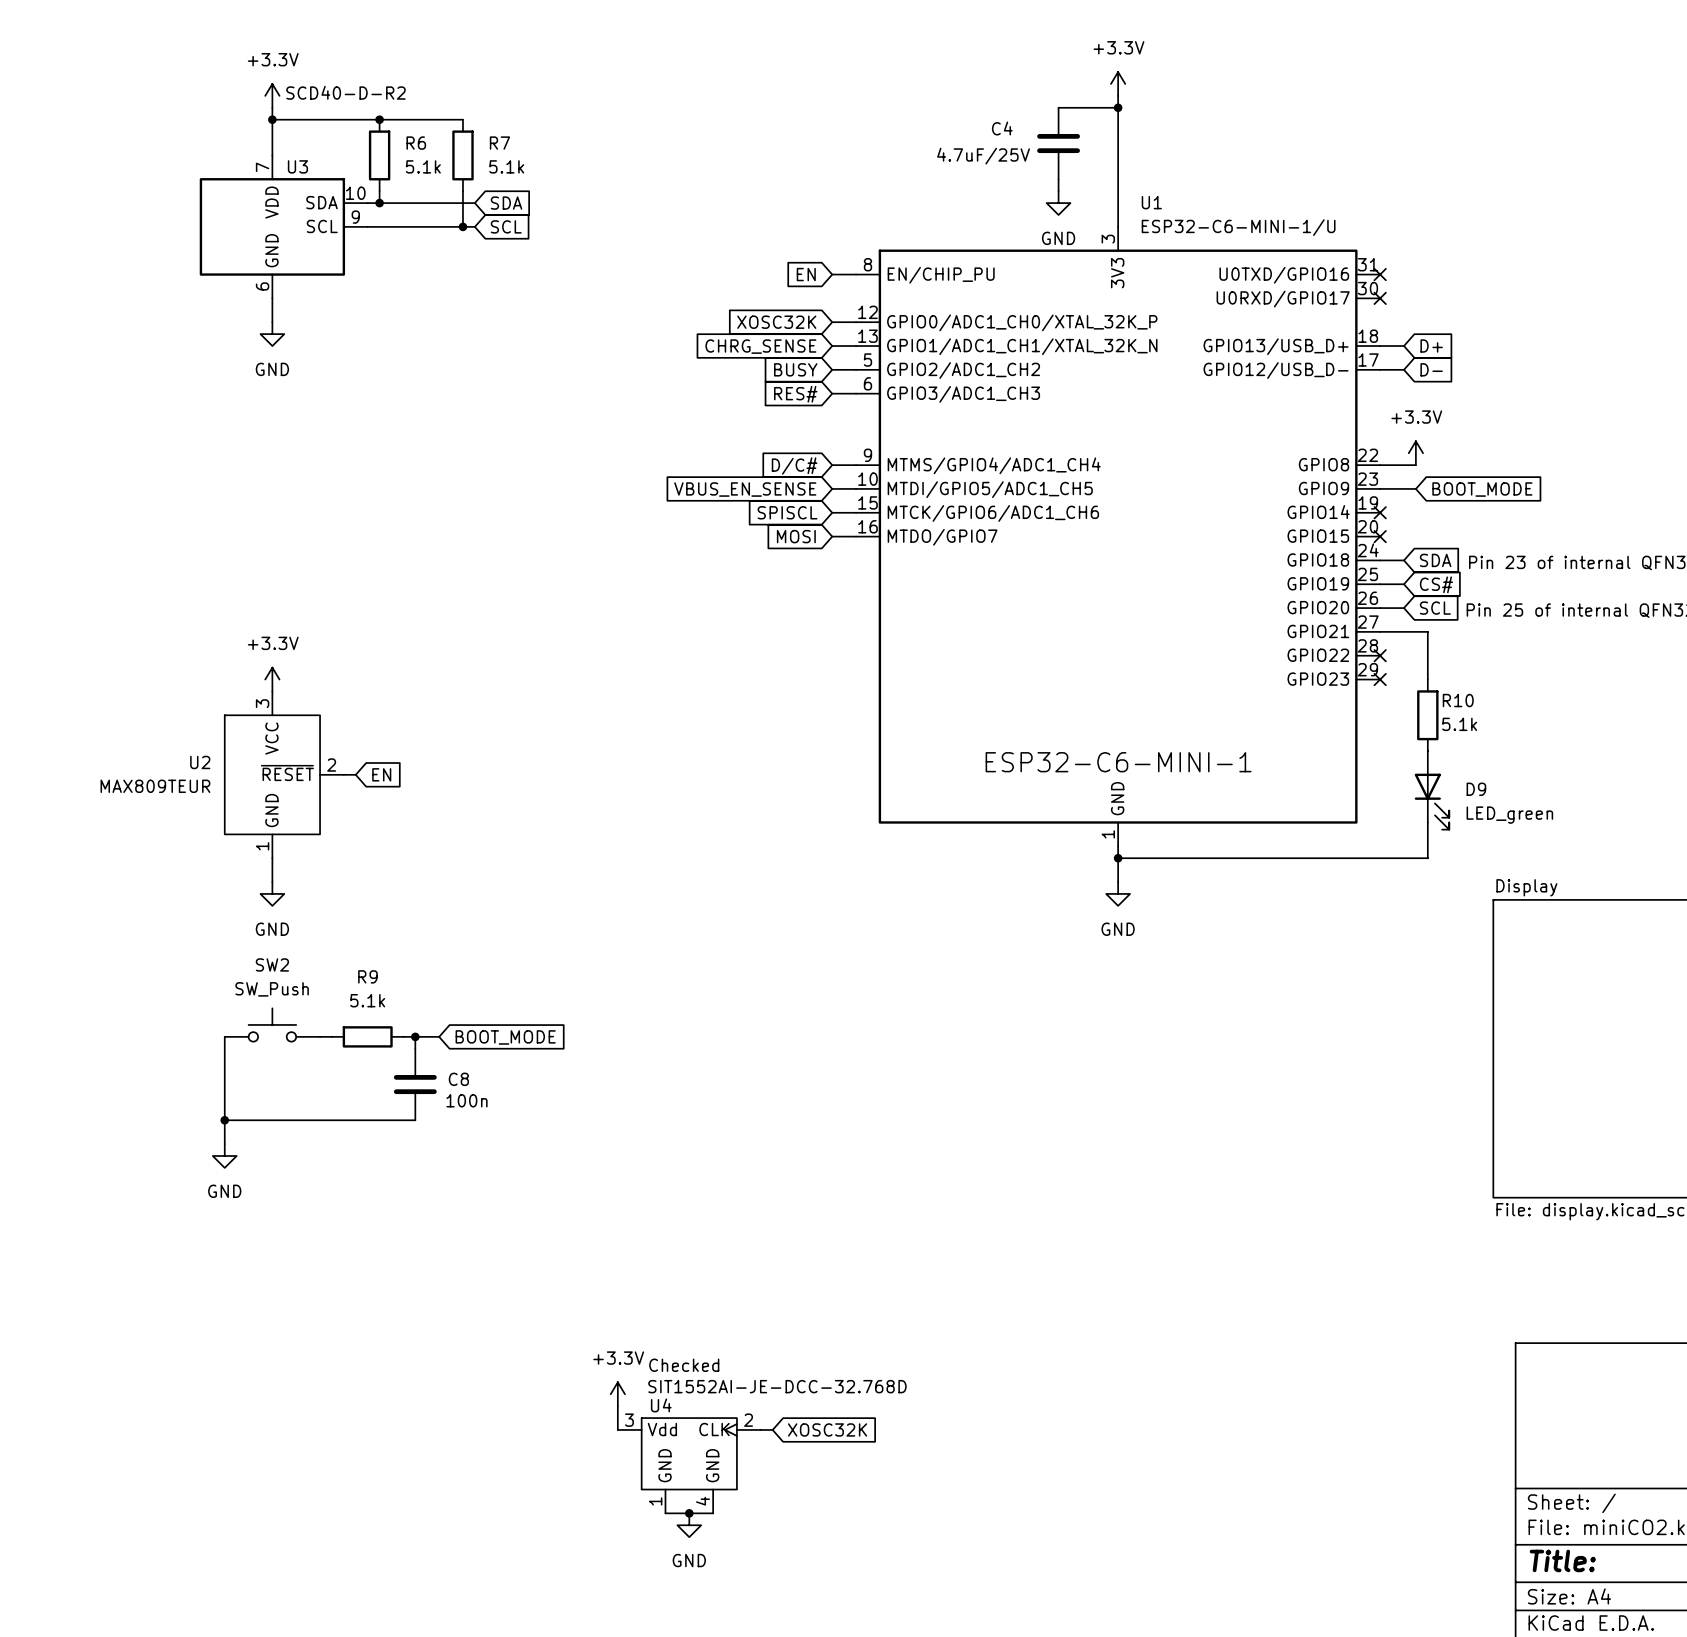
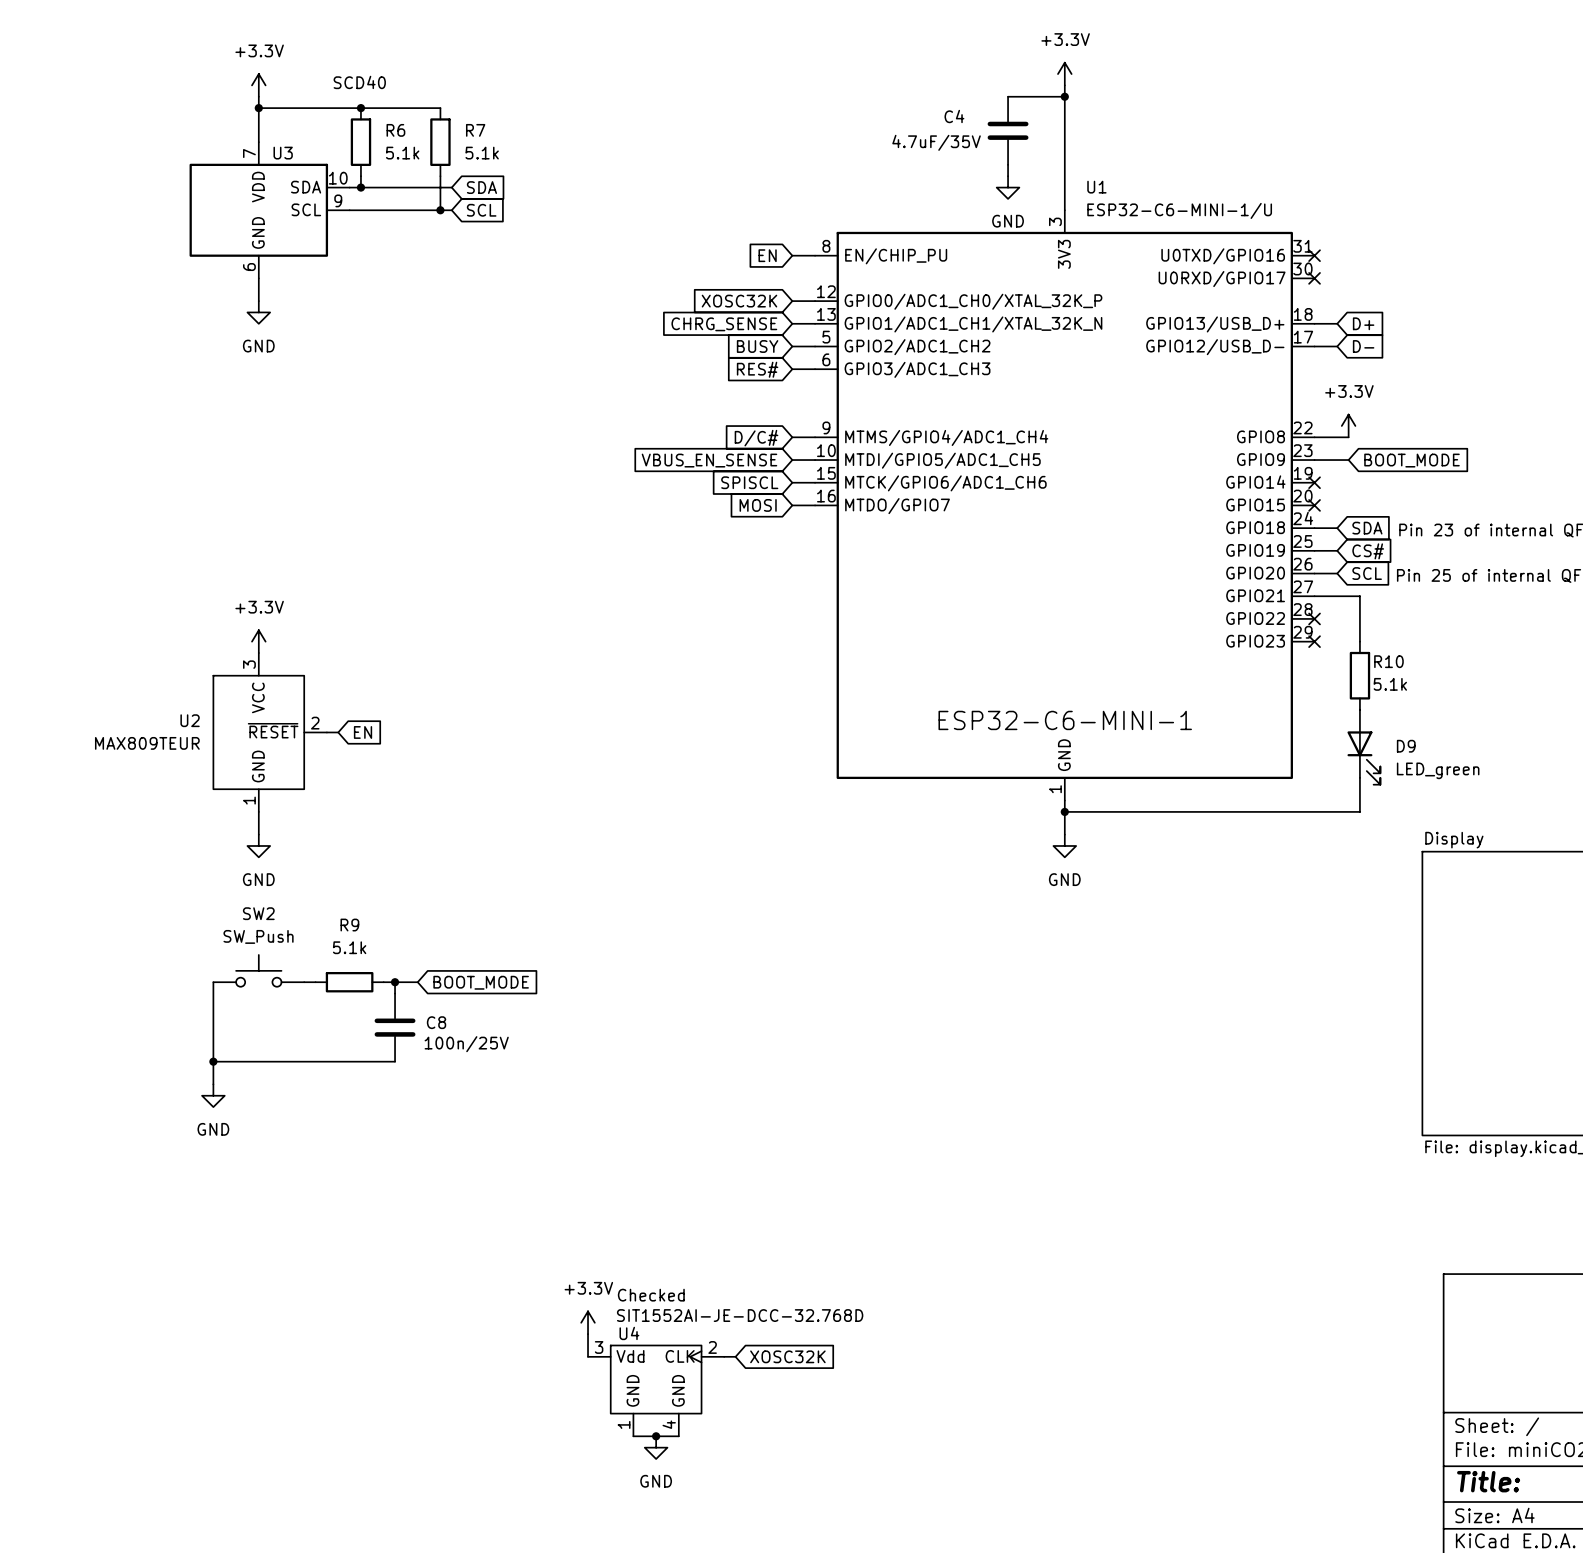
U3 value: SCD40-D-R2 (345, 92) -> SCD40 (359, 82)
C4 value: 4.7uF/25V (983, 156) -> 4.7uF/35V (936, 142)
C8 value: 100n (466, 1100) -> 100n/25V (466, 1044)

